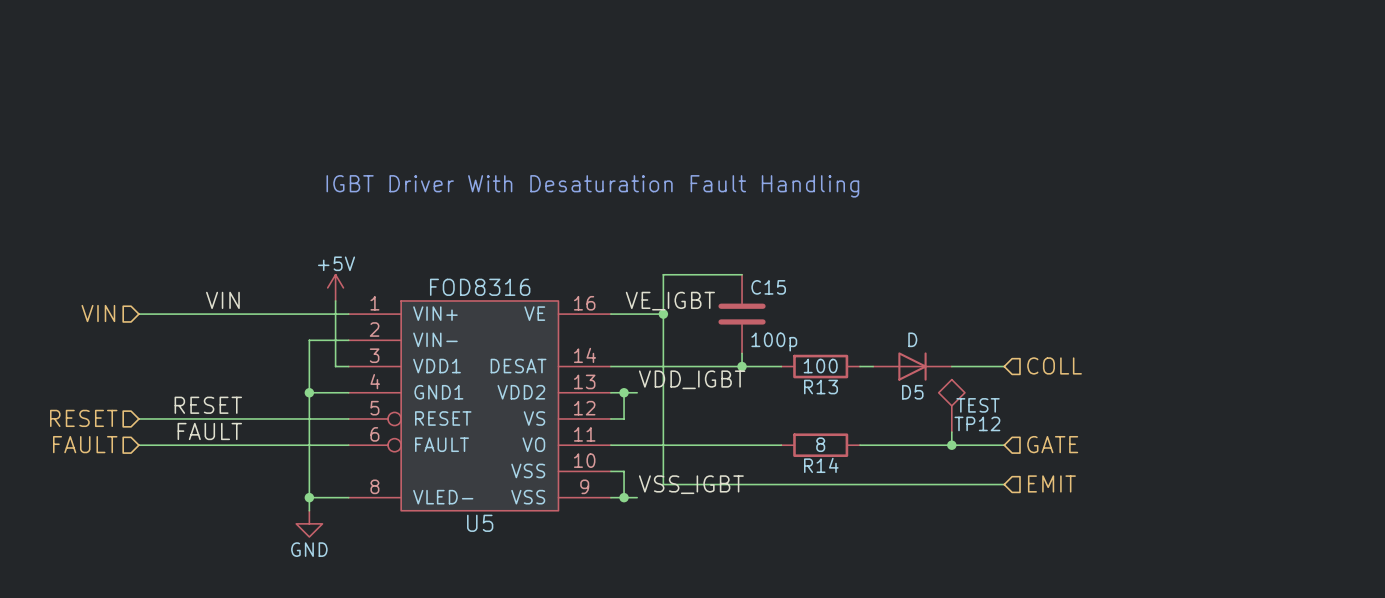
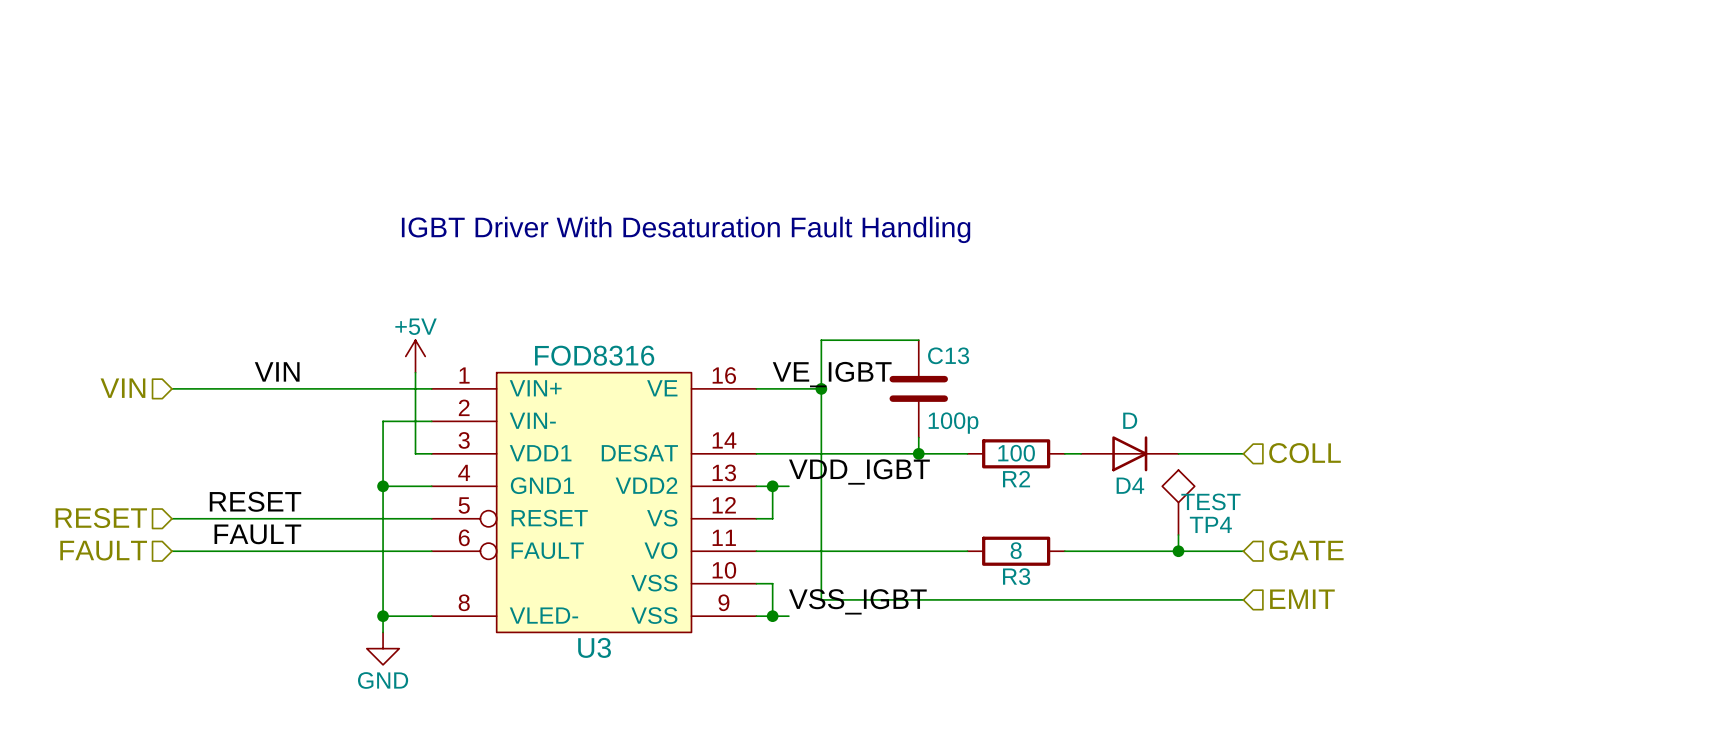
C15 name: C15 (768, 287) -> C13 (948, 355)
R13 name: R13 (821, 387) -> R2 (1016, 479)
D5 name: D5 (912, 392) -> D4 (1130, 485)
TP12 name: TP12 (977, 423) -> TP4 (1210, 524)
R14 name: R14 (821, 465) -> R3 (1016, 576)
U5 name: U5 (480, 523) -> U3 (594, 647)

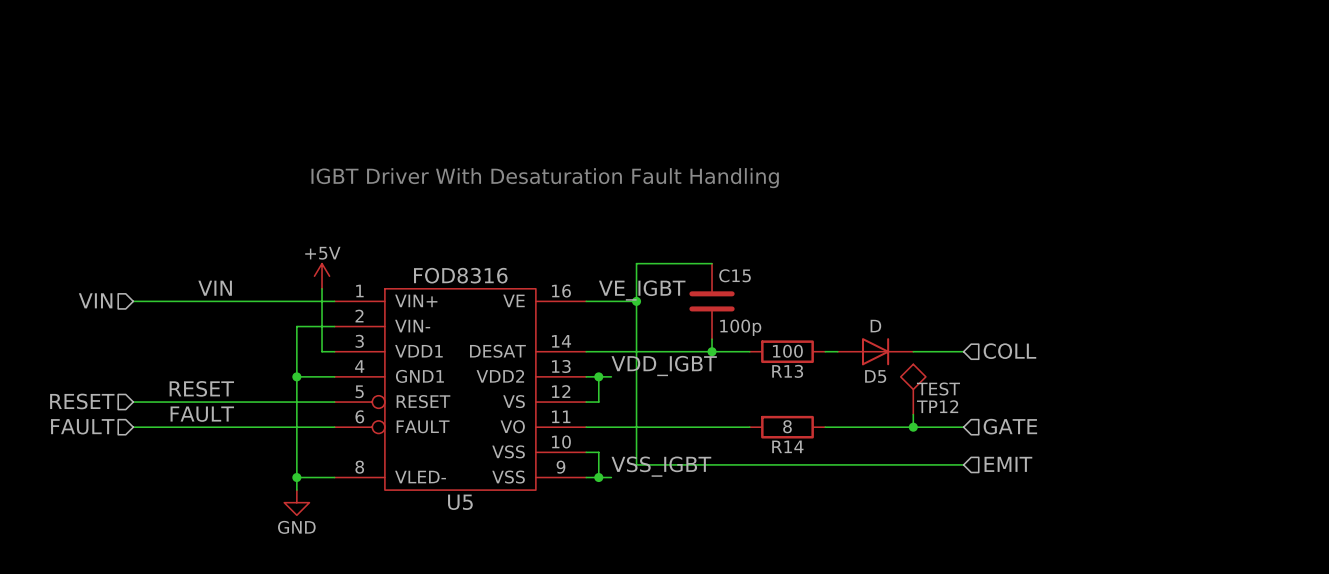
C13 name: C13 (948, 355) -> C15 (735, 275)
R2 name: R2 (1016, 479) -> R13 (787, 371)
D4 name: D4 (1130, 485) -> D5 (875, 376)
TP4 name: TP4 (1210, 524) -> TP12 (937, 406)
R3 name: R3 (1016, 576) -> R14 (787, 446)
U3 name: U3 (594, 647) -> U5 (460, 502)

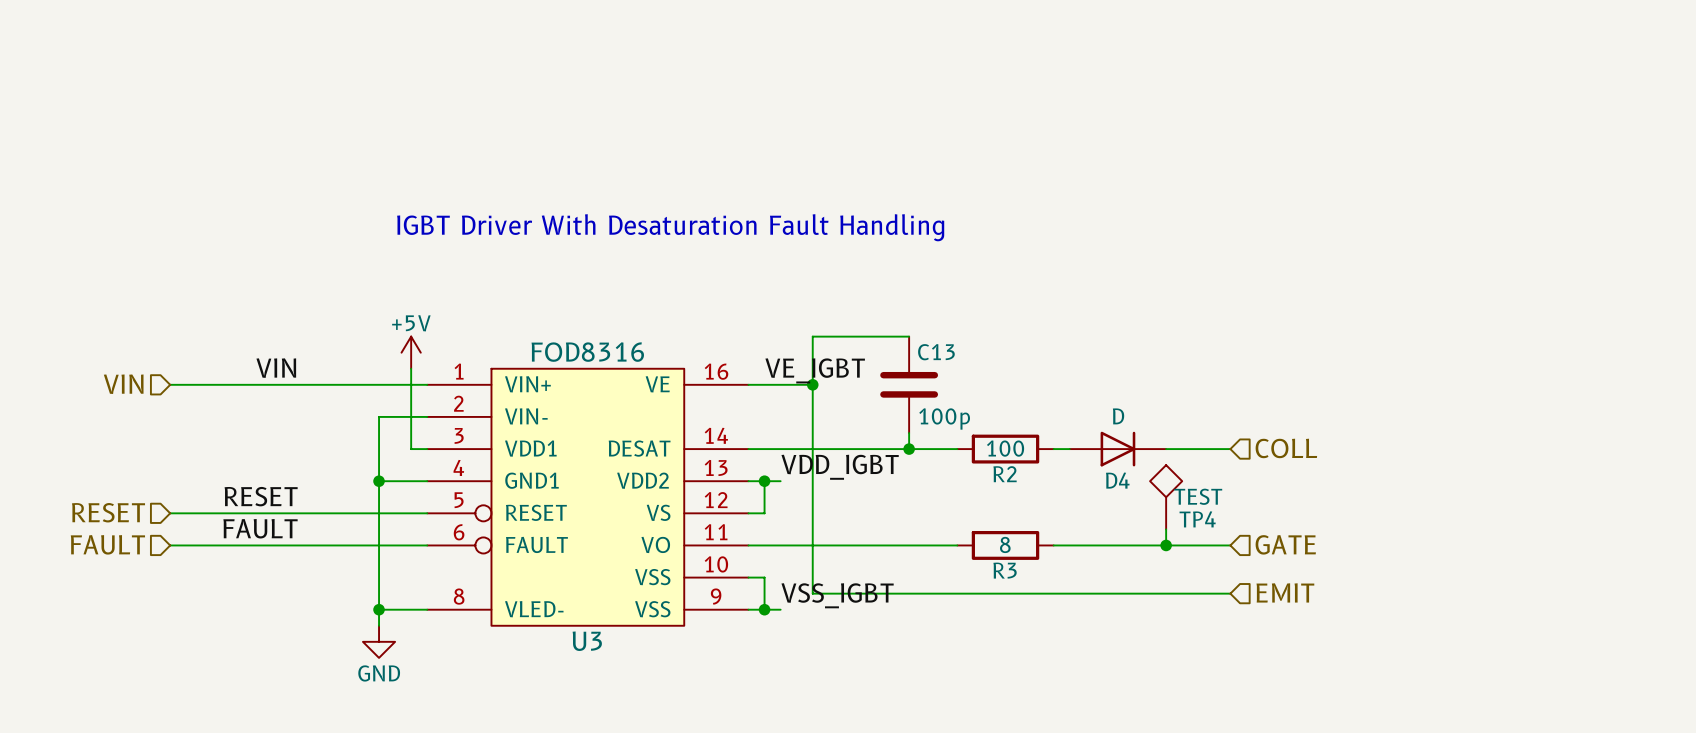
C15 name: C15 (735, 275) -> C13 (936, 352)
R13 name: R13 (787, 371) -> R2 (1005, 474)
D5 name: D5 (875, 376) -> D4 (1117, 480)
TP12 name: TP12 (937, 406) -> TP4 (1197, 519)
R14 name: R14 (787, 446) -> R3 (1005, 570)
U5 name: U5 (460, 502) -> U3 (587, 641)

